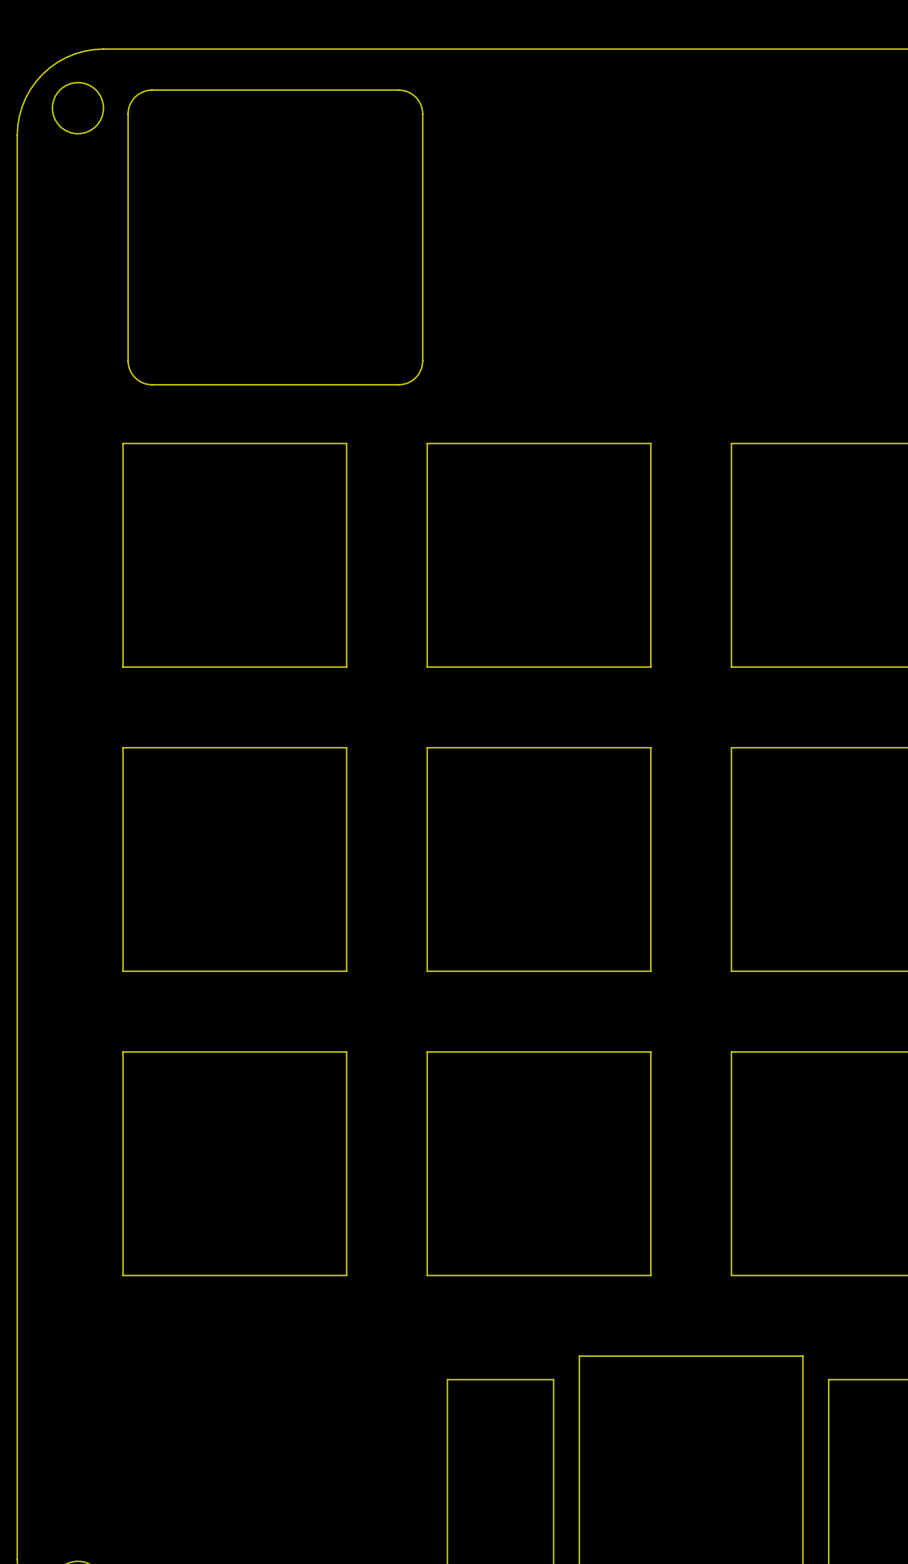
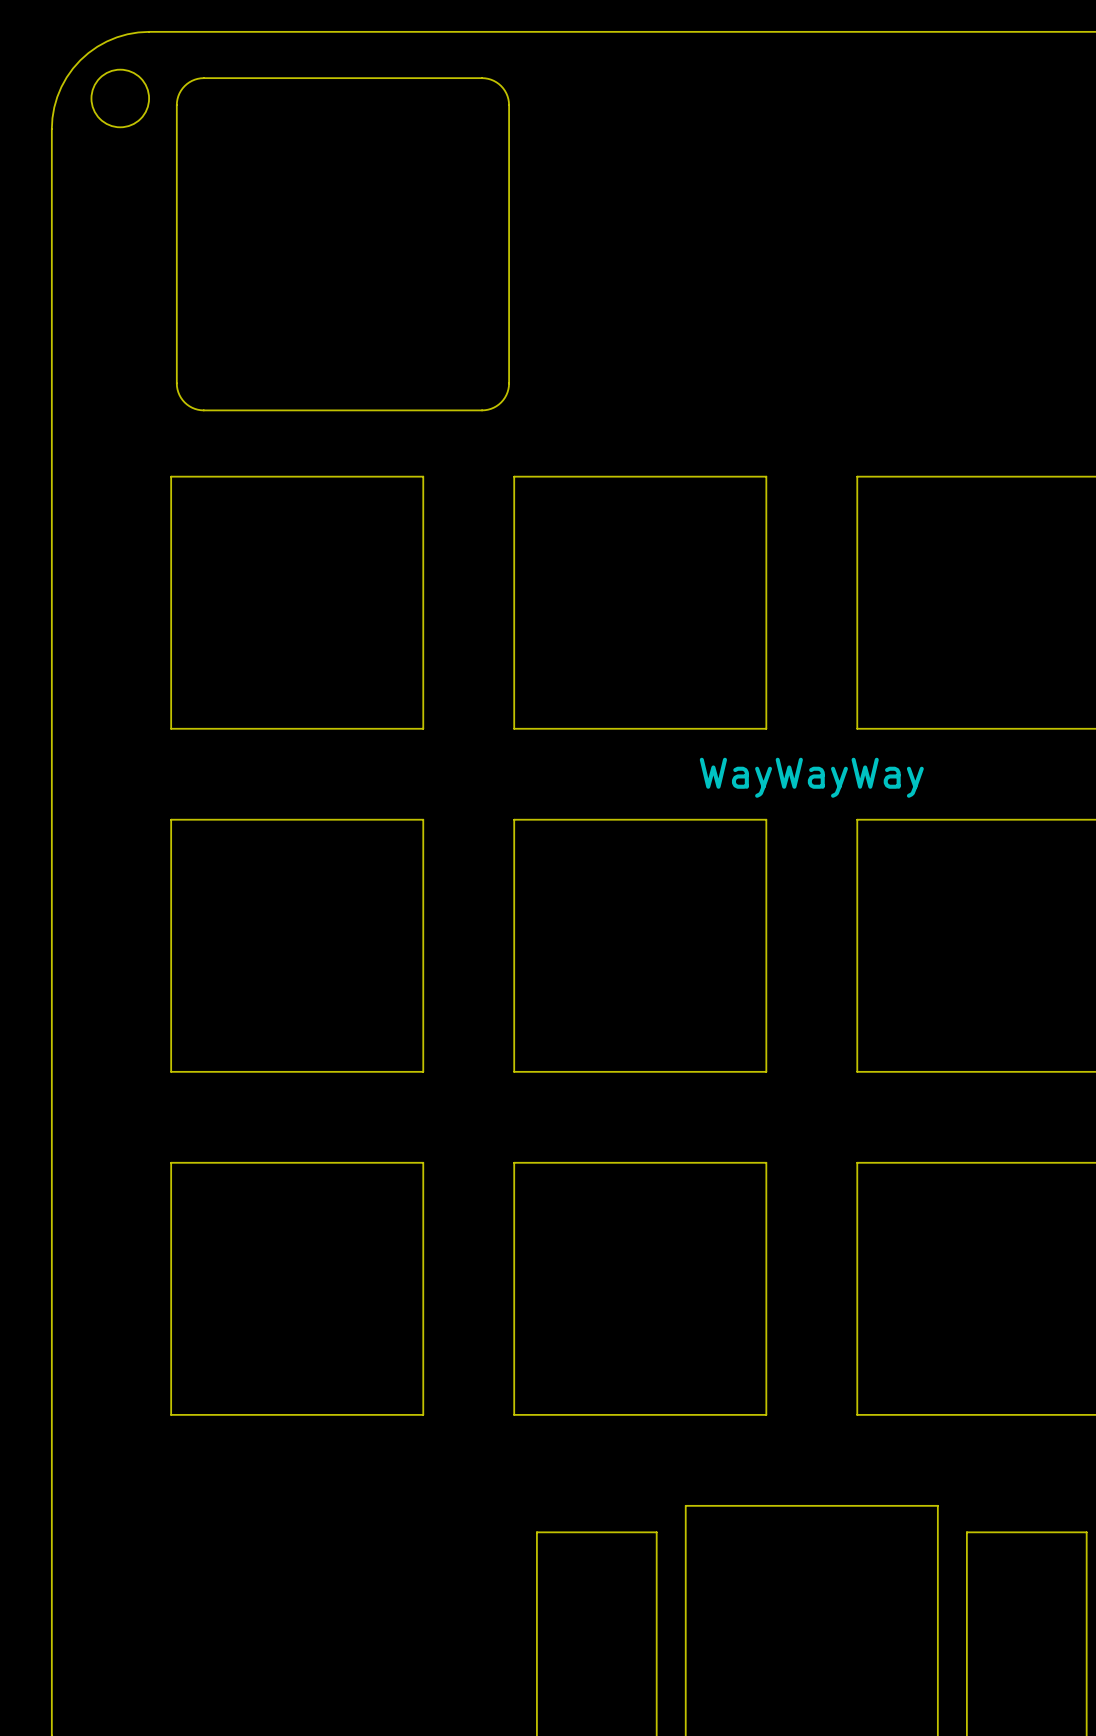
text: none -> WayWayWay (811, 777)

